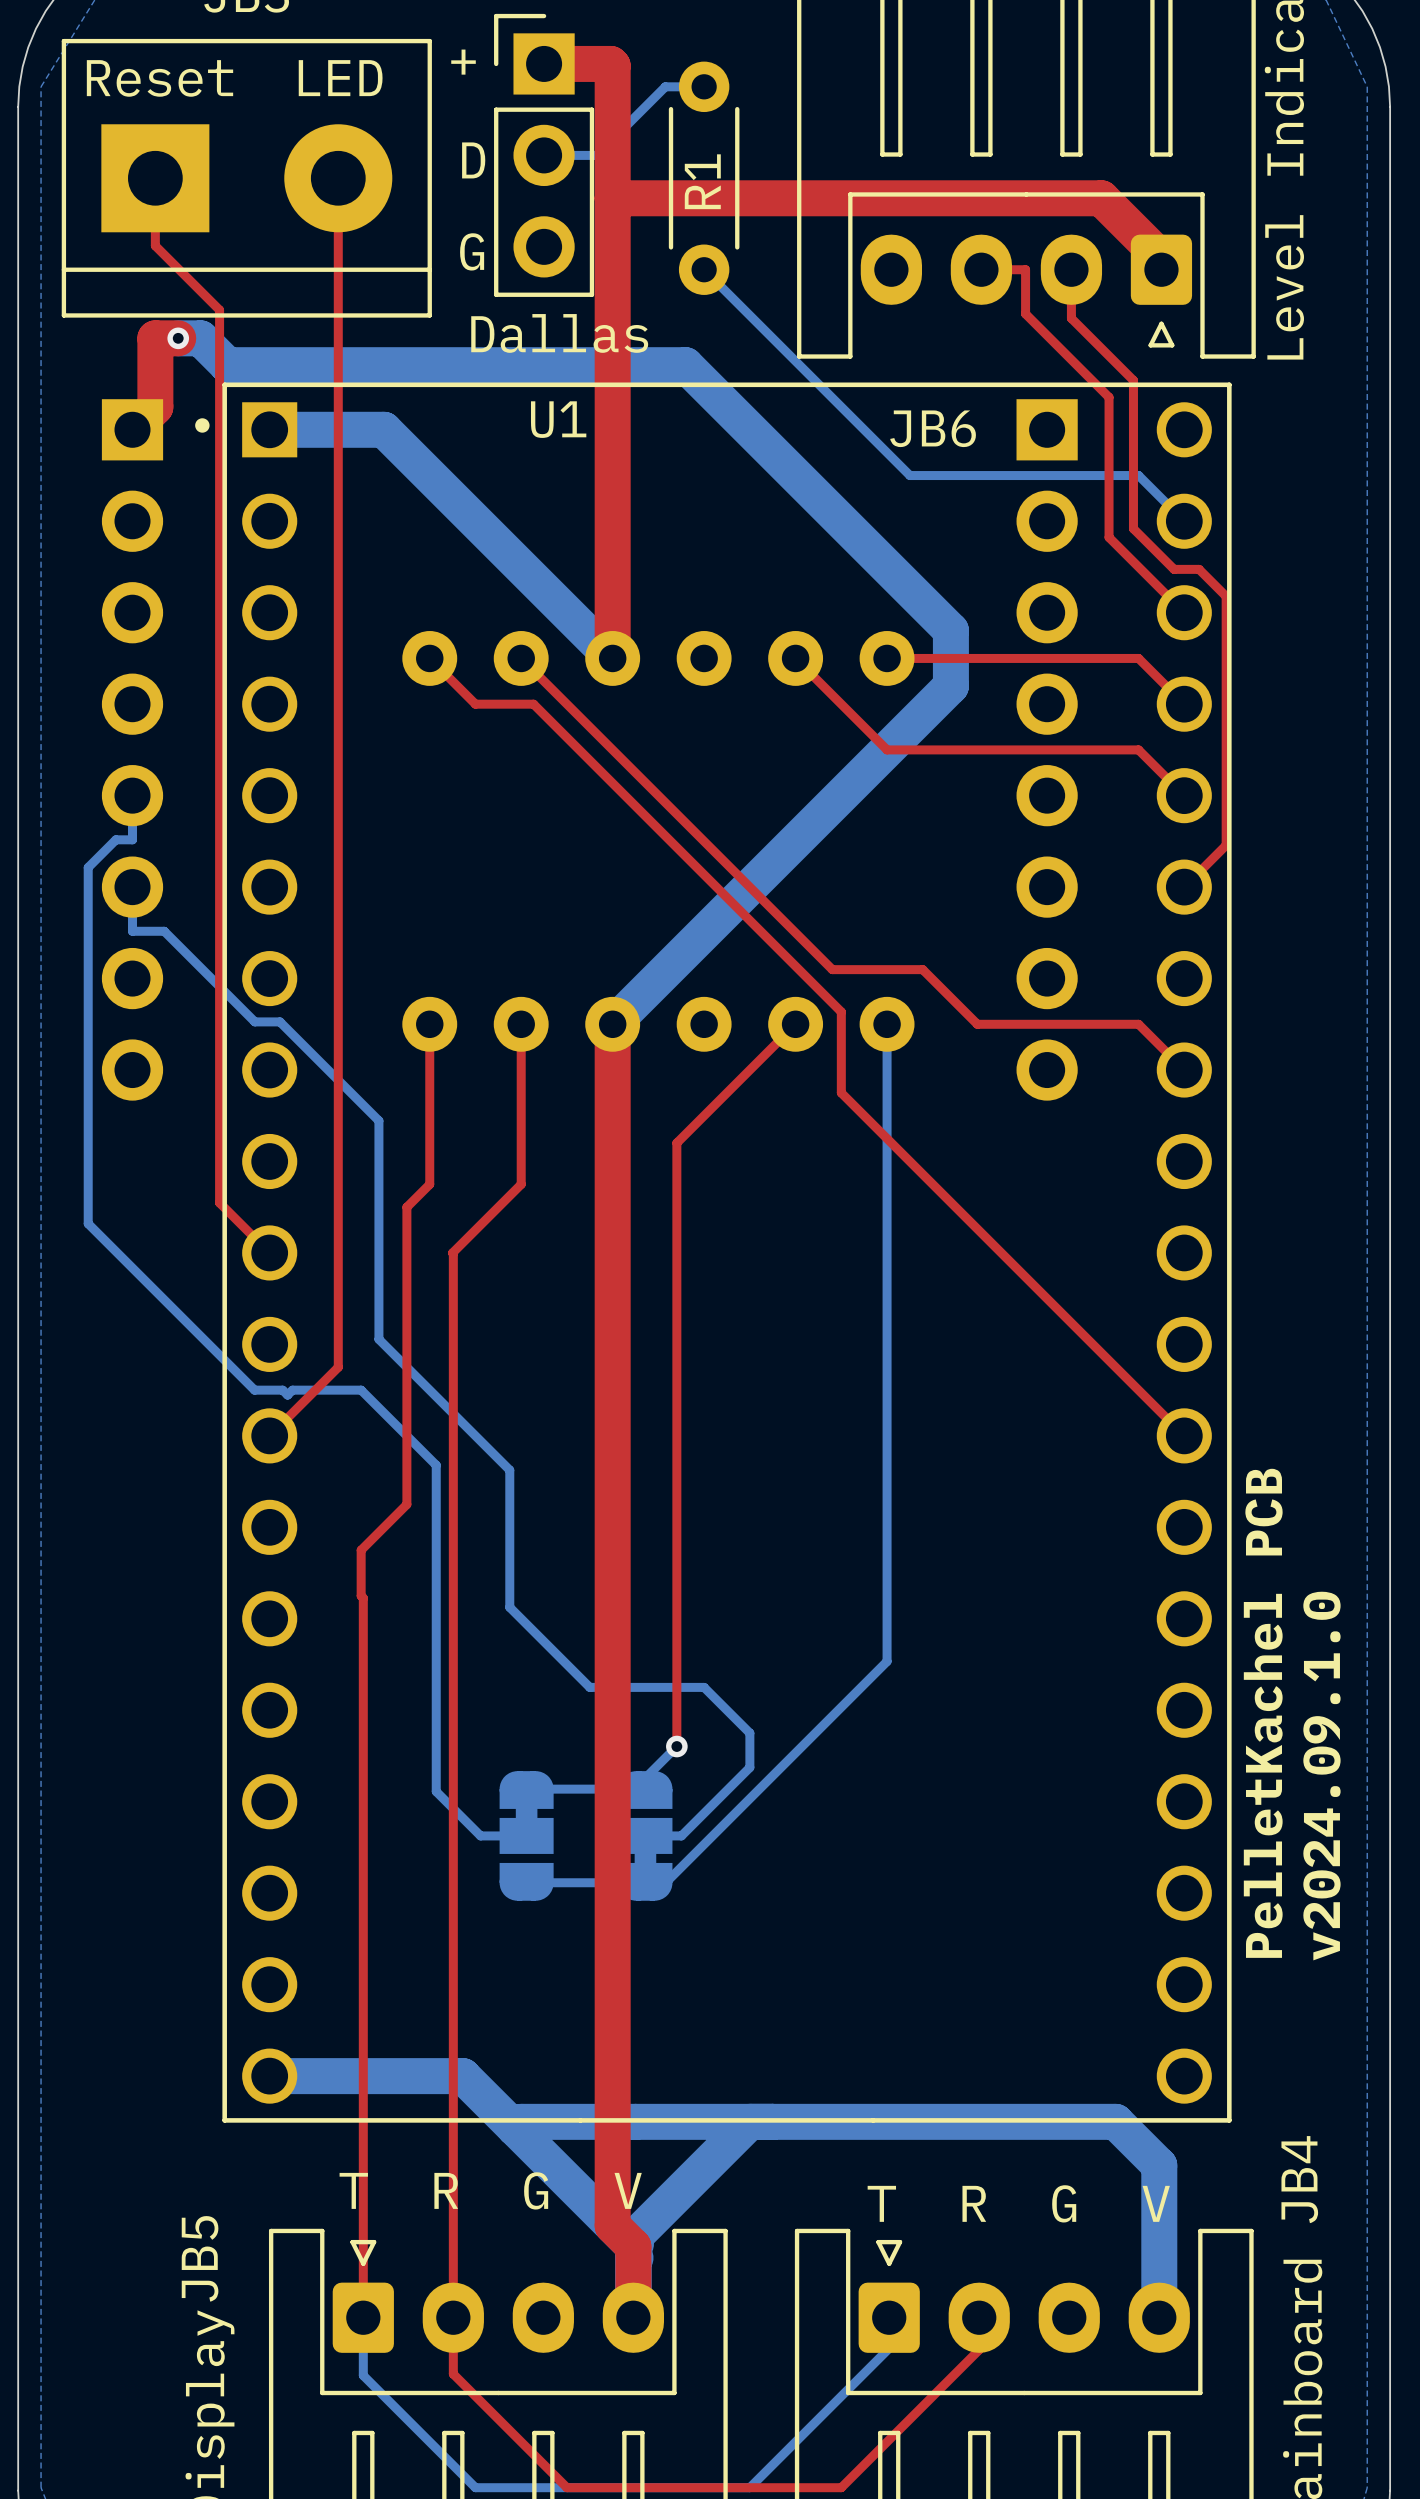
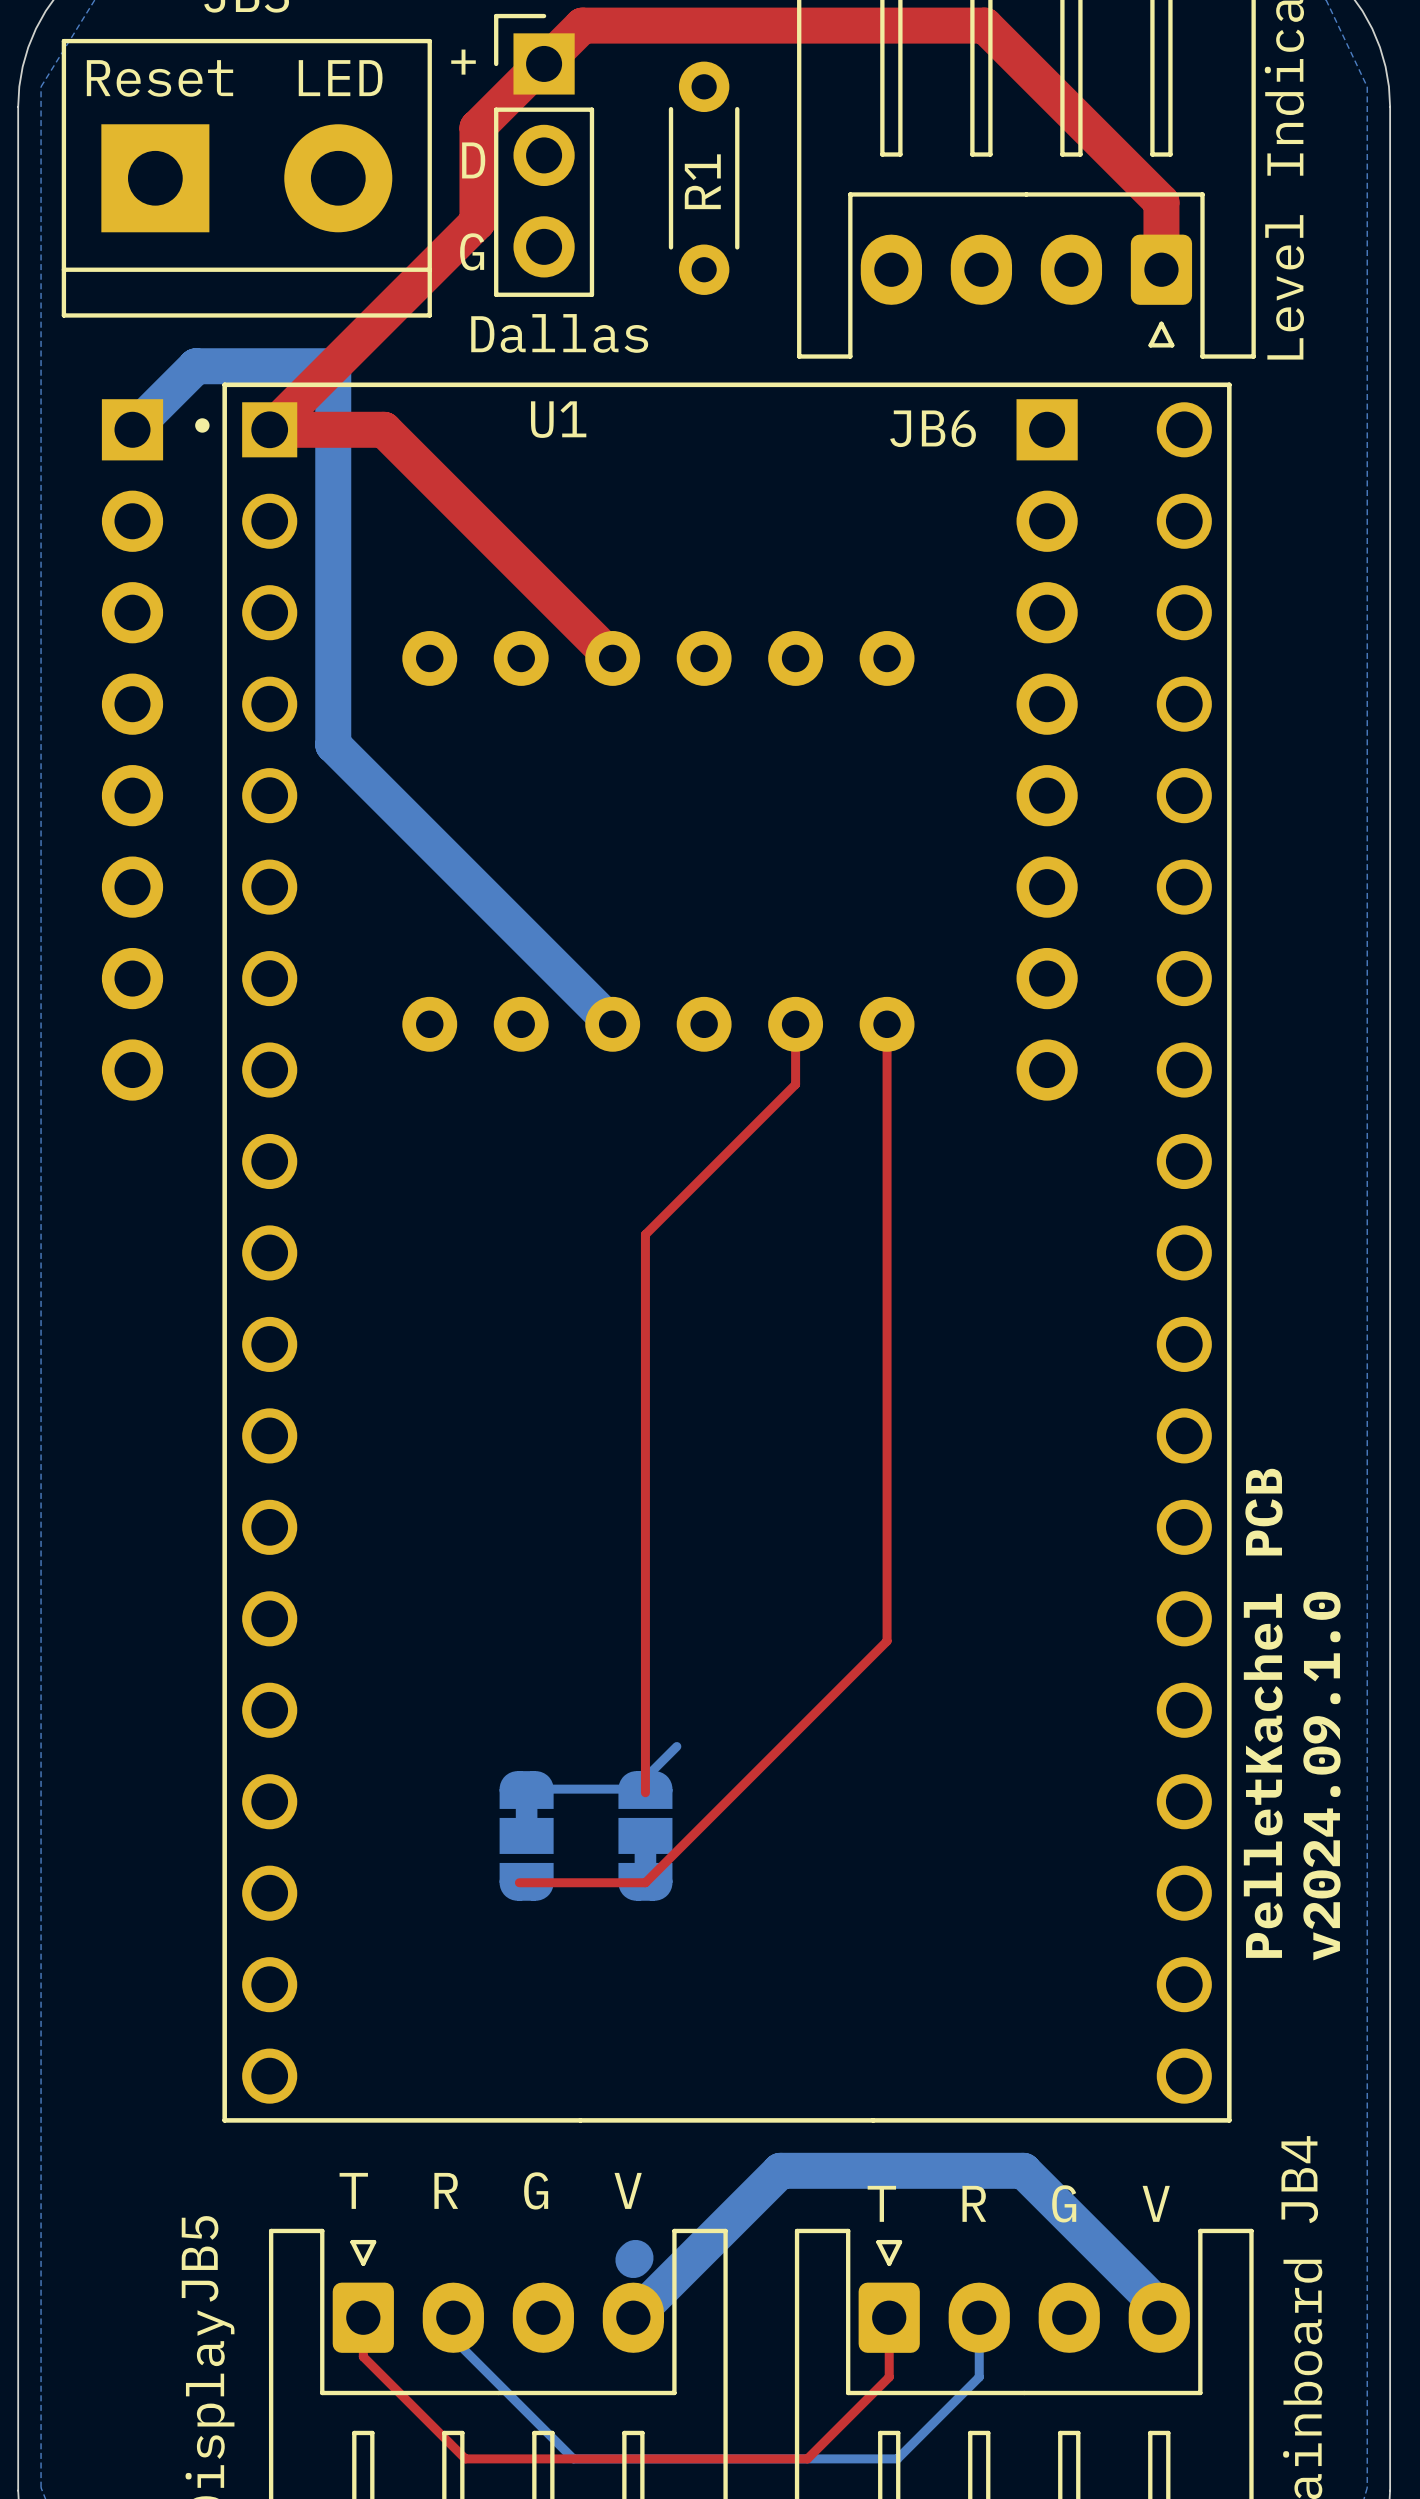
top track: (544, 63) (610, 63) (612, 65) (612, 658) -> none
bottom track: (704, 86) (665, 86) (596, 155) (544, 155) -> none
top track: (155, 178) (155, 245) (219, 310) (219, 1202) (269, 1252) -> none
top track: (338, 178) (338, 1367) (269, 1435) -> none
top track: (612, 198) (1101, 198) (1161, 258) -> (612, 658) (384, 429) (269, 429) (477, 222) (477, 127) (582, 25) (984, 25) (1161, 202) (1161, 258)
bottom track: (704, 269) (909, 475) (1138, 475) (1184, 521) -> none
top track: (981, 269) (1025, 269) (1025, 313) (1109, 397) (1109, 537) (1184, 612) -> none
top track: (1071, 269) (1071, 318) (1133, 380) (1133, 528) (1174, 569) (1199, 569) (1226, 596) (1226, 845) (1184, 887) -> none
bottom track: (178, 338) (200, 338) (227, 365) (685, 365) (950, 630) (950, 686) (612, 1024) -> (132, 429) (196, 366) (333, 366) (333, 744) (612, 1024)
top track: (178, 338) (155, 338) (155, 406) (132, 429) -> none
via: (178, 338) -> none
bottom track: (269, 429) (384, 429) (612, 658) -> none
top track: (429, 658) (475, 704) (533, 704) (841, 1011) (841, 1092) (1184, 1435) -> none
top track: (521, 658) (832, 969) (922, 969) (977, 1024) (1138, 1024) (1184, 1070) -> none
top track: (795, 658) (887, 749) (1138, 749) (1184, 795) -> none
top track: (887, 658) (1138, 658) (1184, 704) -> none
bottom track: (132, 795) (132, 839) (115, 839) (88, 867) (88, 1223) (254, 1390) (282, 1390) (287, 1395) (292, 1390) (361, 1390) (436, 1465) (436, 1791) (480, 1835) (526, 1835) -> none
bottom track: (132, 887) (132, 931) (164, 931) (254, 1021) (279, 1021) (378, 1120) (378, 1339) (509, 1470) (509, 1607) (589, 1687) (704, 1687) (749, 1733) (749, 1767) (681, 1835) (645, 1835) -> none
top track: (429, 1024) (429, 1184) (406, 1207) (406, 1504) (361, 1550) (361, 1595) (363, 1598) (363, 2317) -> (889, 2317) (889, 2377) (807, 2458) (465, 2458) (363, 2356) (363, 2317)
top track: (521, 1024) (521, 1184) (452, 1252) (453, 2374) (566, 2487) (841, 2487) (979, 2349) (979, 2317) -> none
top track: (612, 1024) (612, 2225) (633, 2246) (633, 2317) -> none
top track: (795, 1024) (676, 1143) (676, 1746) -> (795, 1024) (795, 1084) (645, 1234) (645, 1792)
bottom track: (887, 1024) (887, 1661) (665, 1882) (526, 1882) -> none
top track: none -> (887, 1024) (887, 1641) (645, 1882) (519, 1882)
via: (676, 1746) -> none
bottom track: (269, 2076) (462, 2076) (633, 2246) (635, 2243) -> none
bottom track: (749, 2121) (633, 2238) (633, 2317) -> none
bottom track: (514, 2128) (521, 2121) (1115, 2121) (1159, 2165) (1159, 2306) -> (633, 2317) (780, 2170) (1023, 2170) (1159, 2306)
bottom track: (363, 2317) (363, 2375) (475, 2487) (749, 2487) (889, 2348) (889, 2317) -> none
bottom track: none -> (453, 2317) (453, 2338) (573, 2458) (897, 2458) (979, 2377) (979, 2317)

